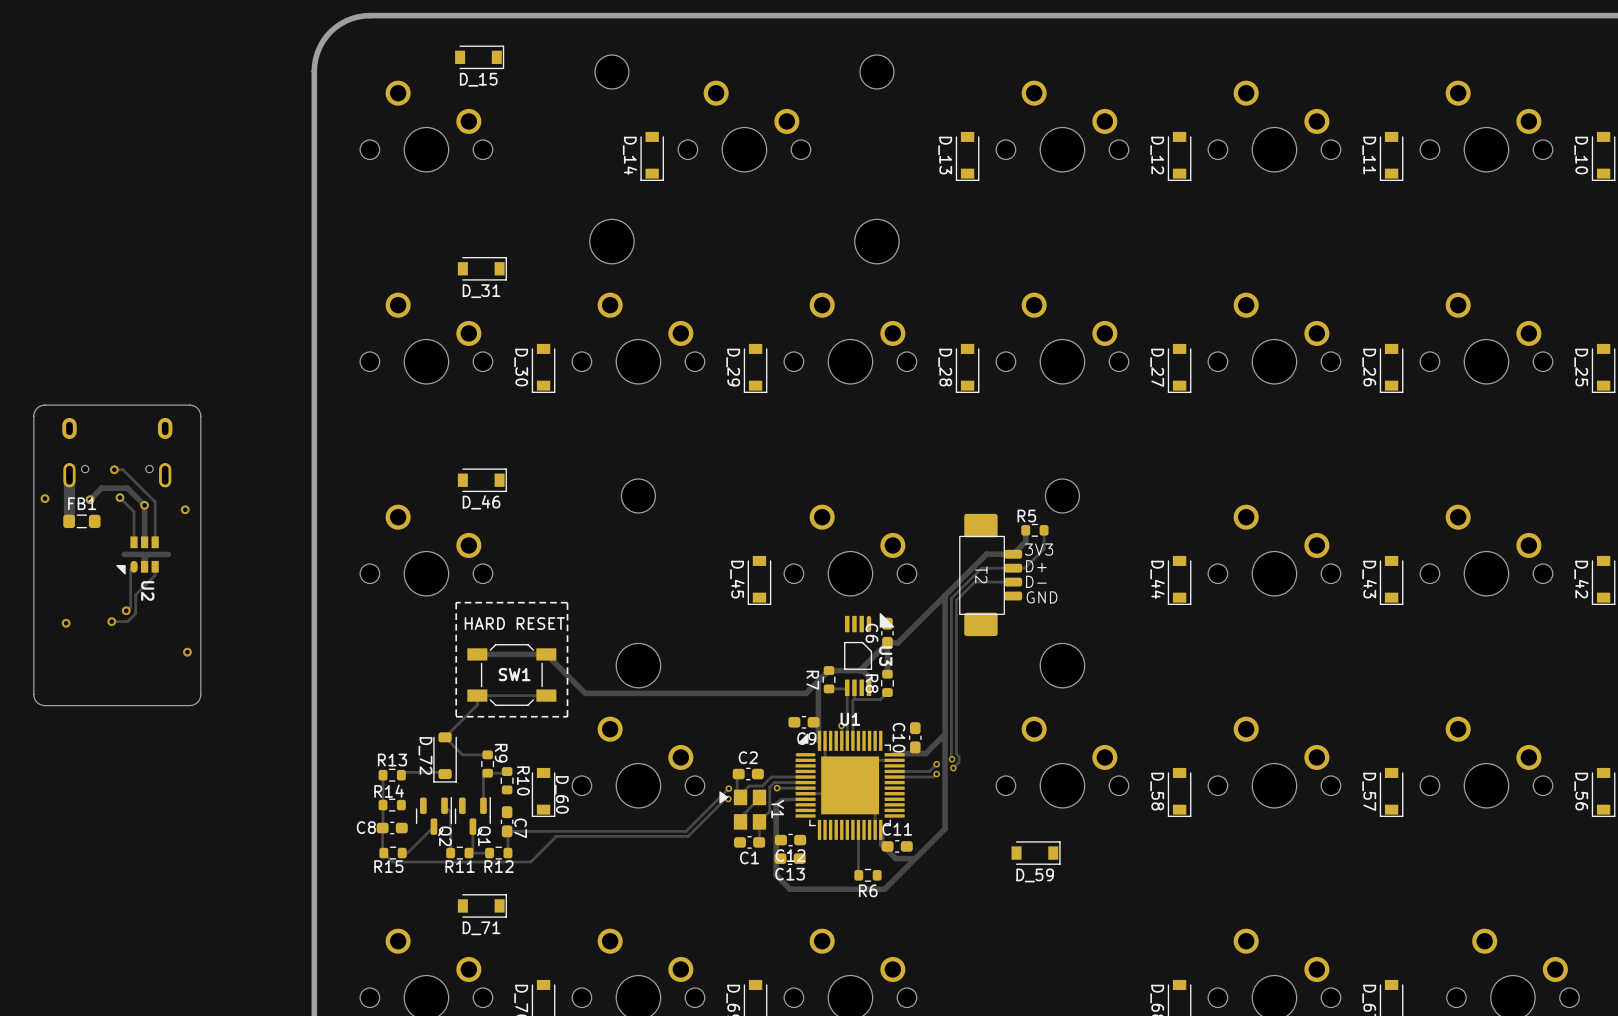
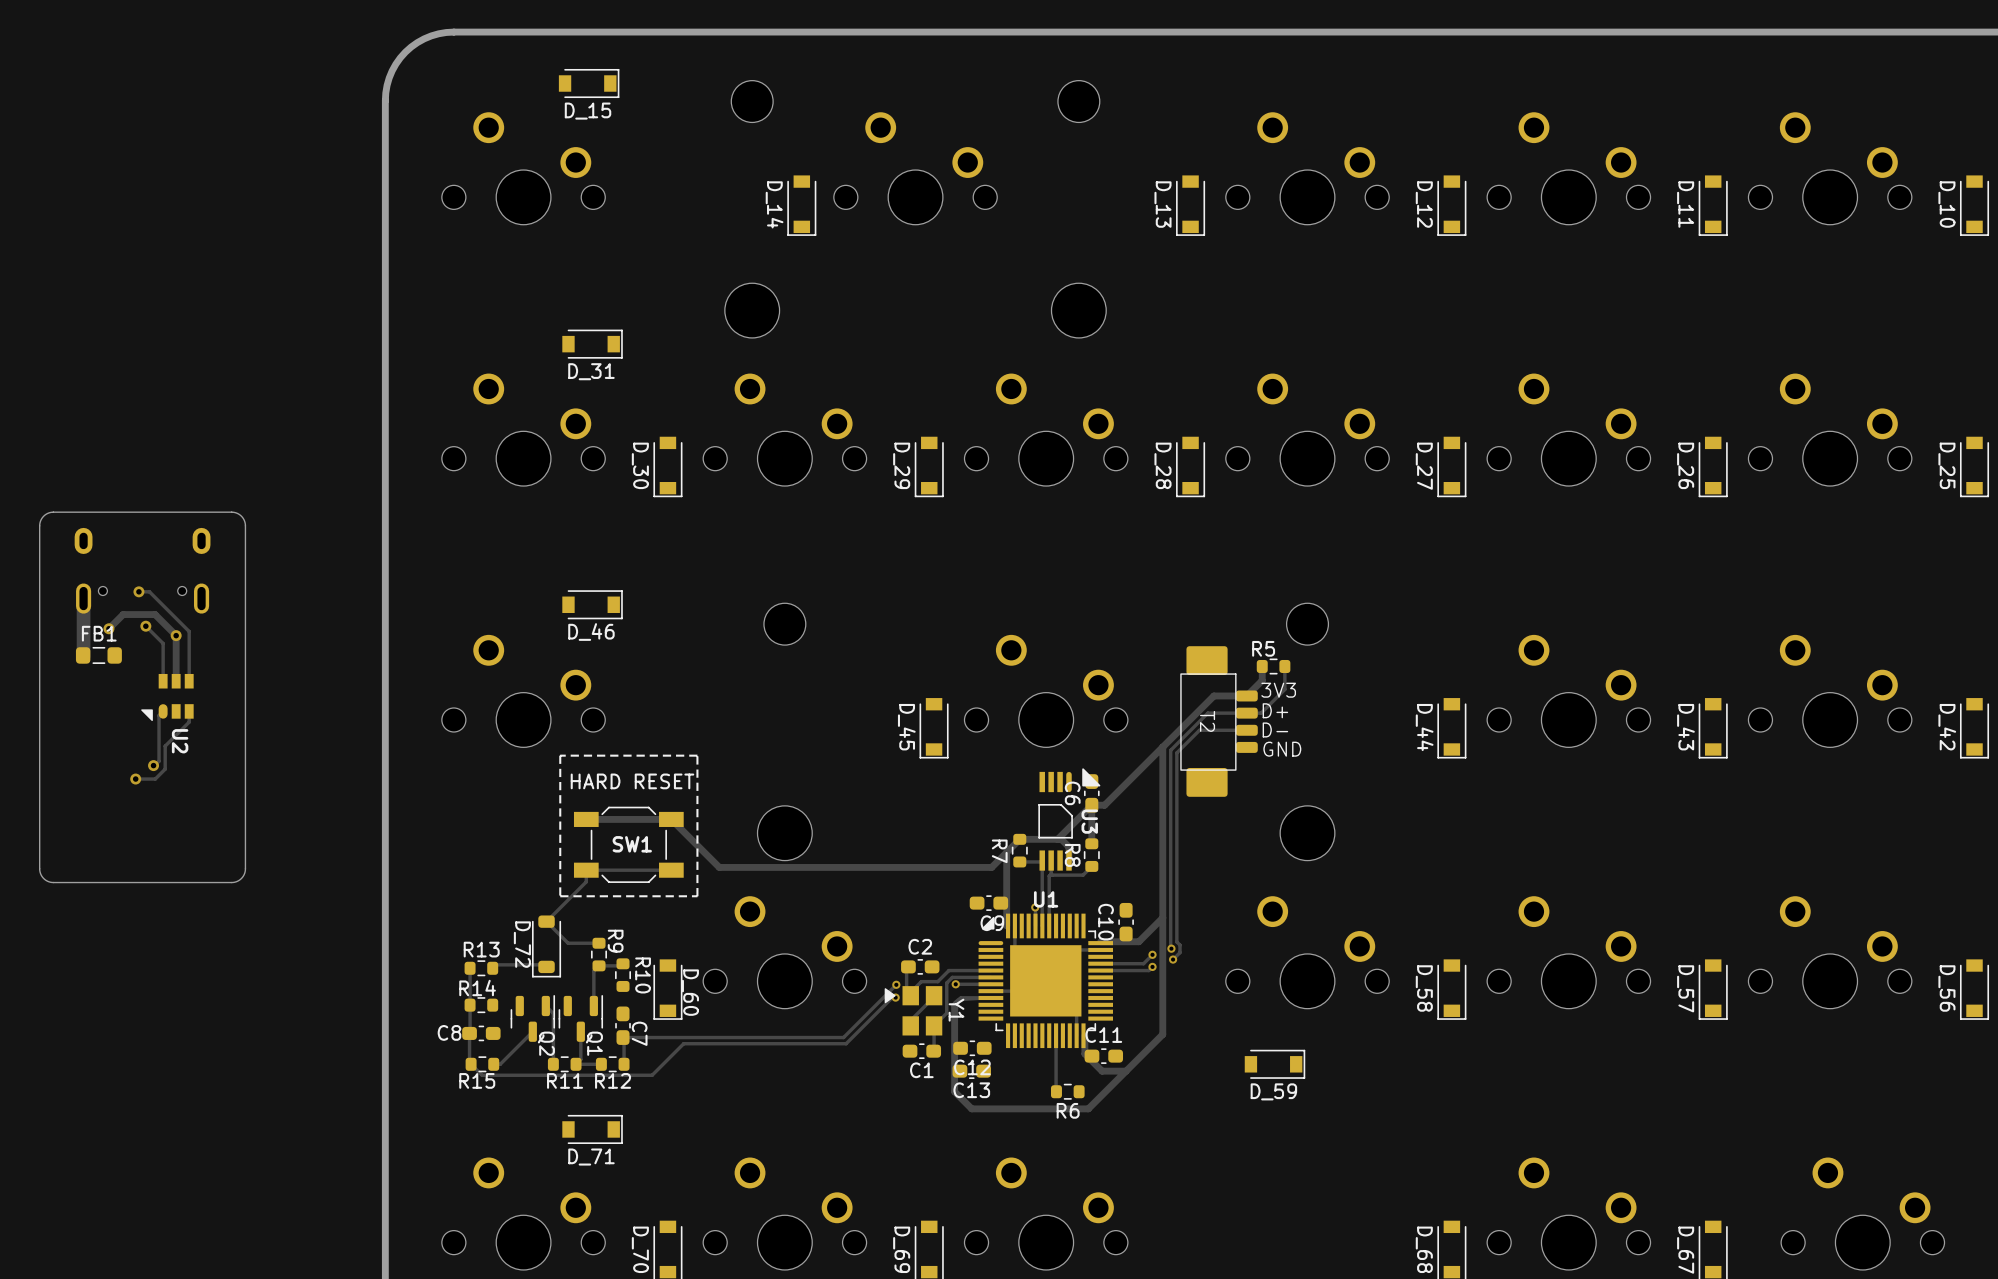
via: (44, 498) -> none
via: (185, 509) -> none
track: (124, 554) (143, 554) (144, 566) -> none
track: (168, 554) (147, 554) (144, 557) -> none
via: (66, 623) -> none
via: (187, 652) -> none

